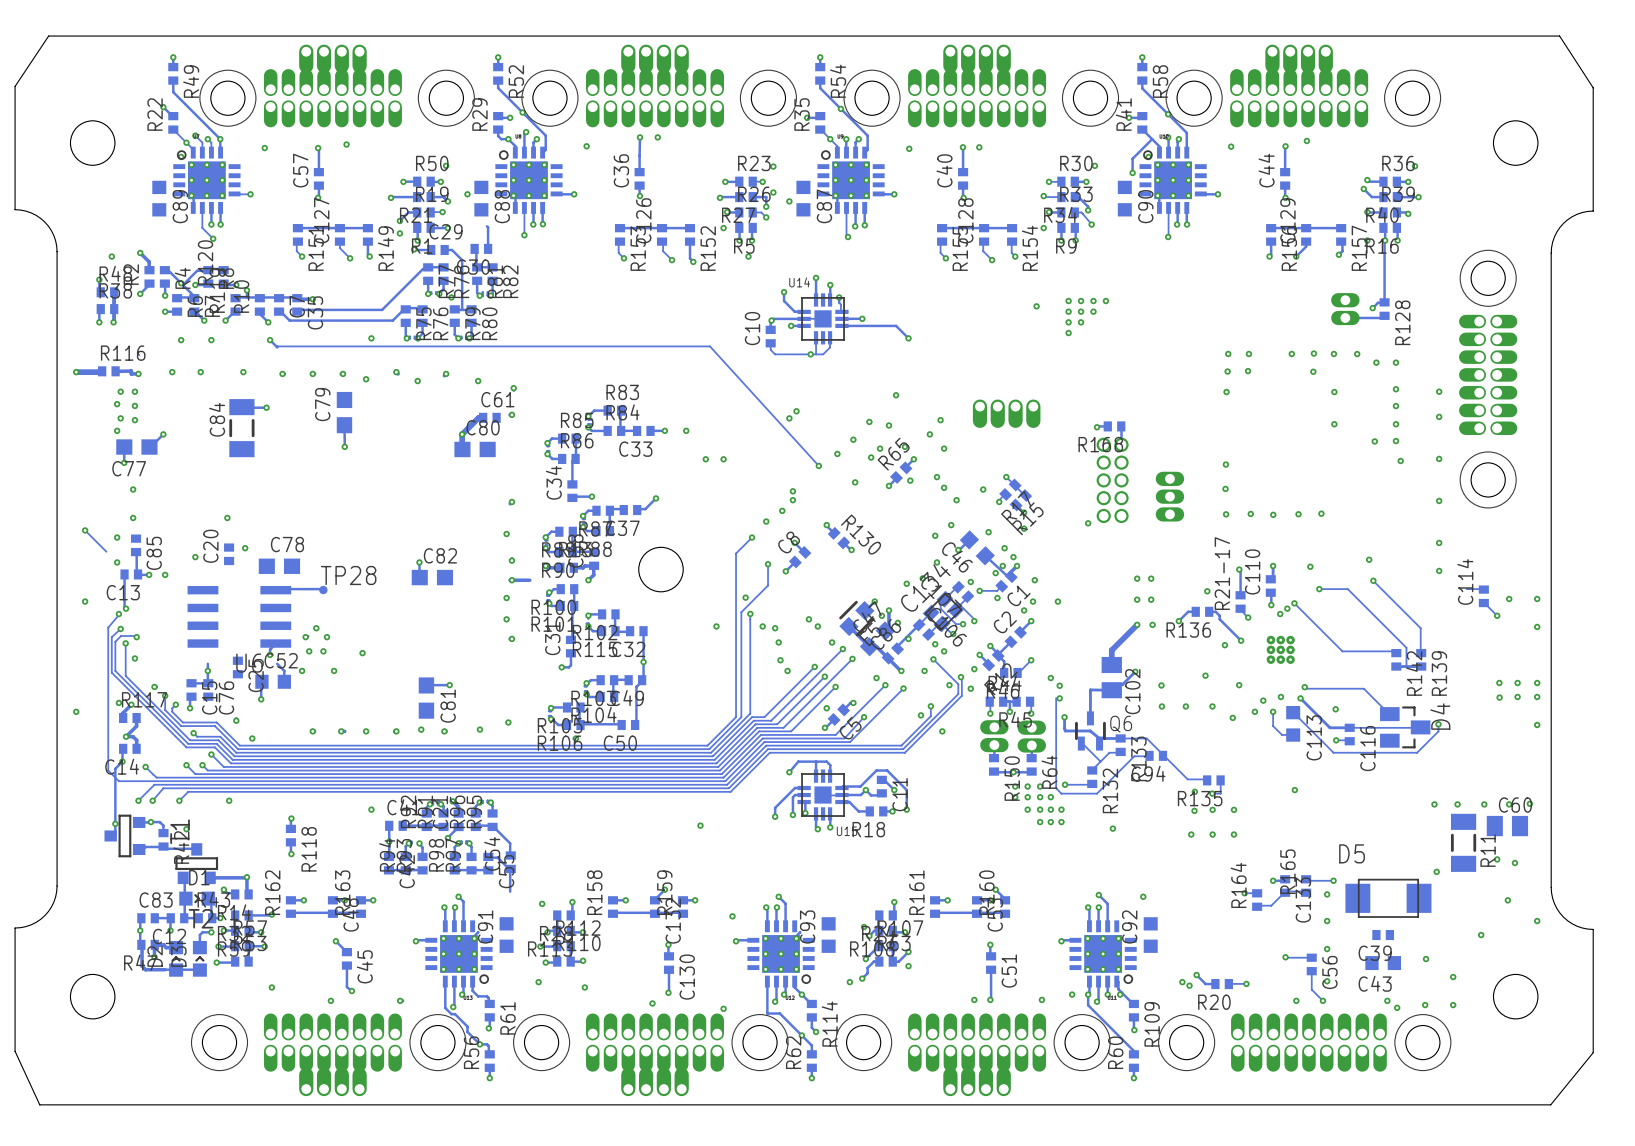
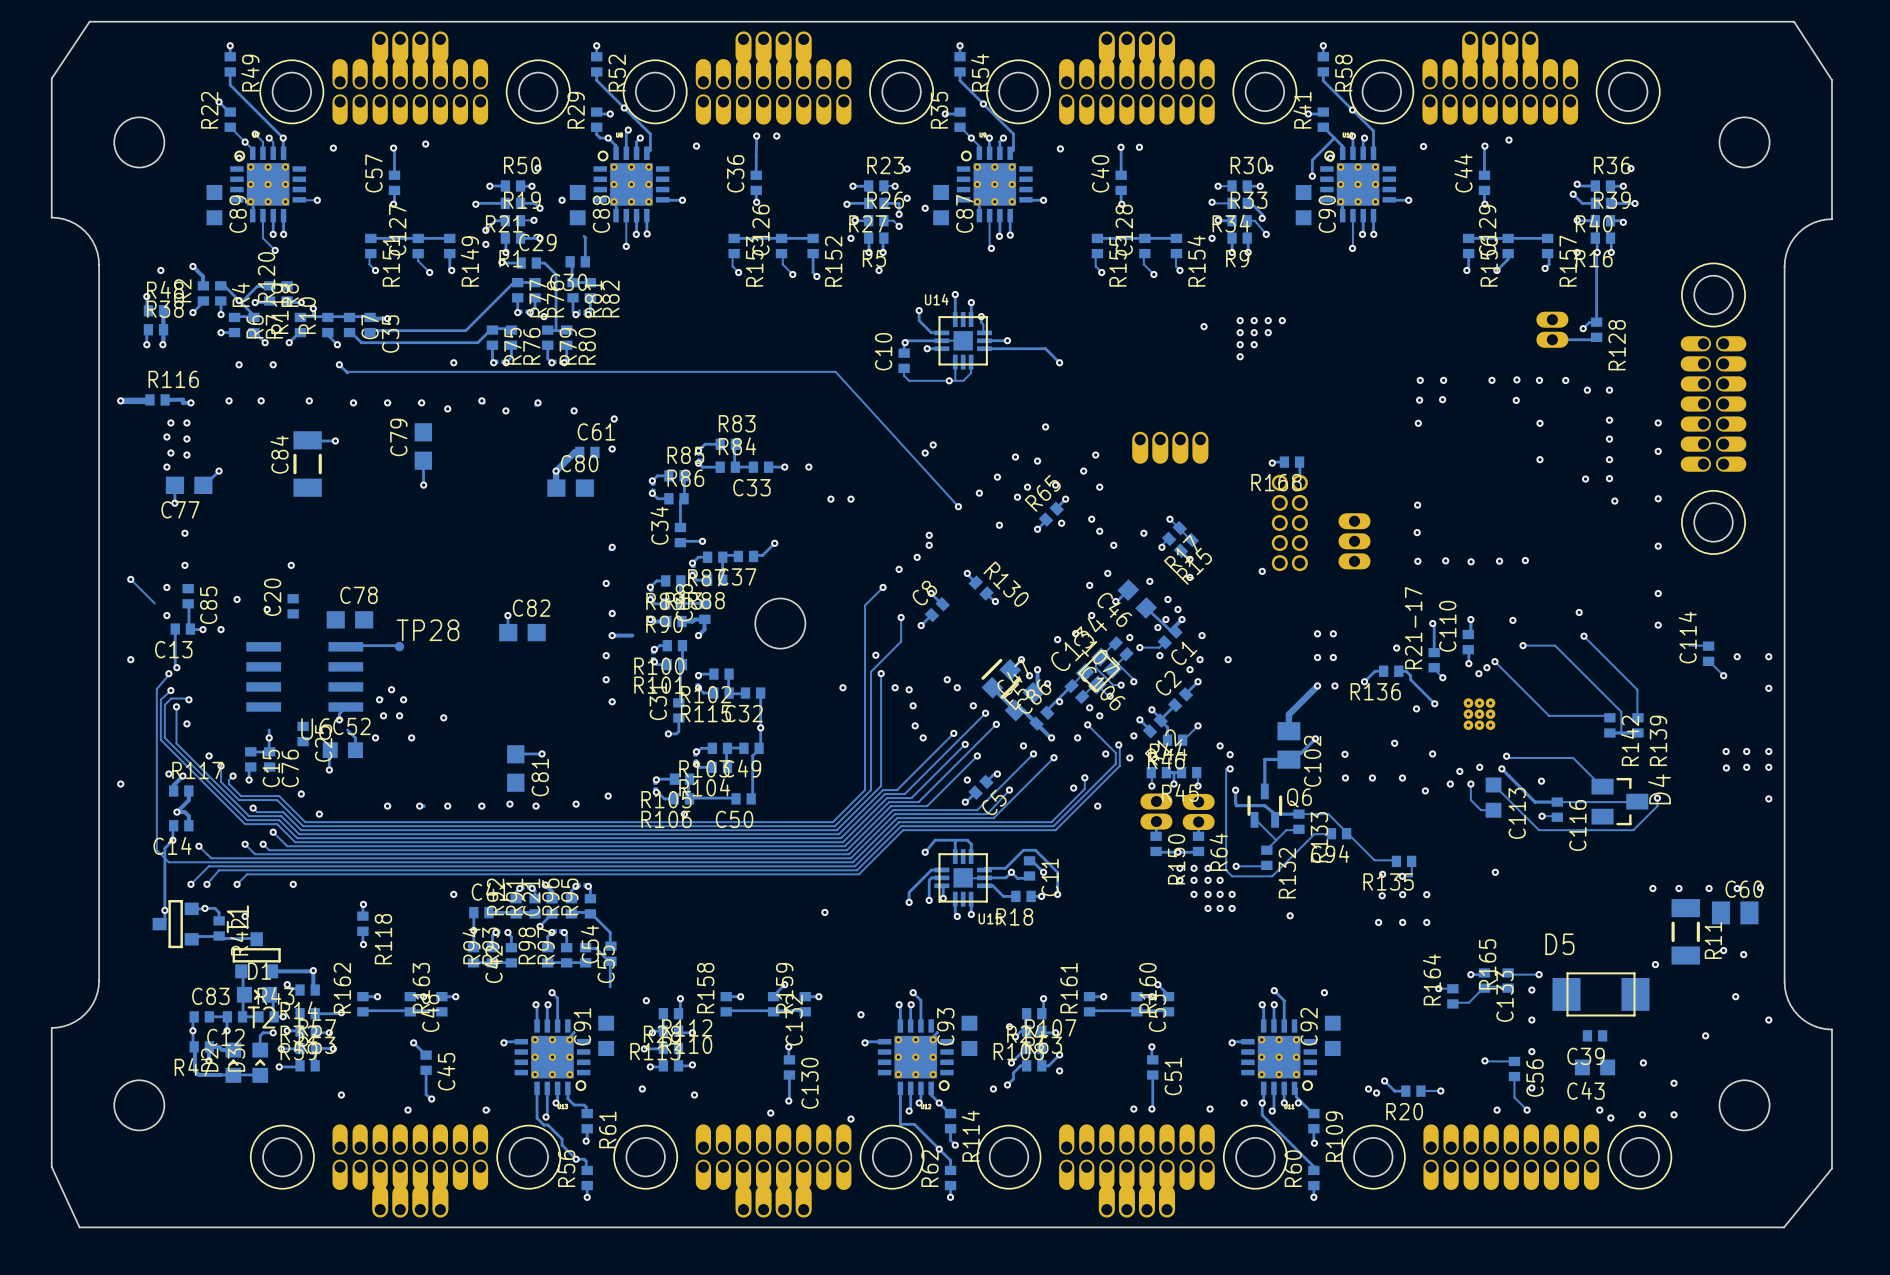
via: none -> (237, 599)
via: (245, 548) -> none
via: (195, 557) -> none
via: none -> (267, 609)

